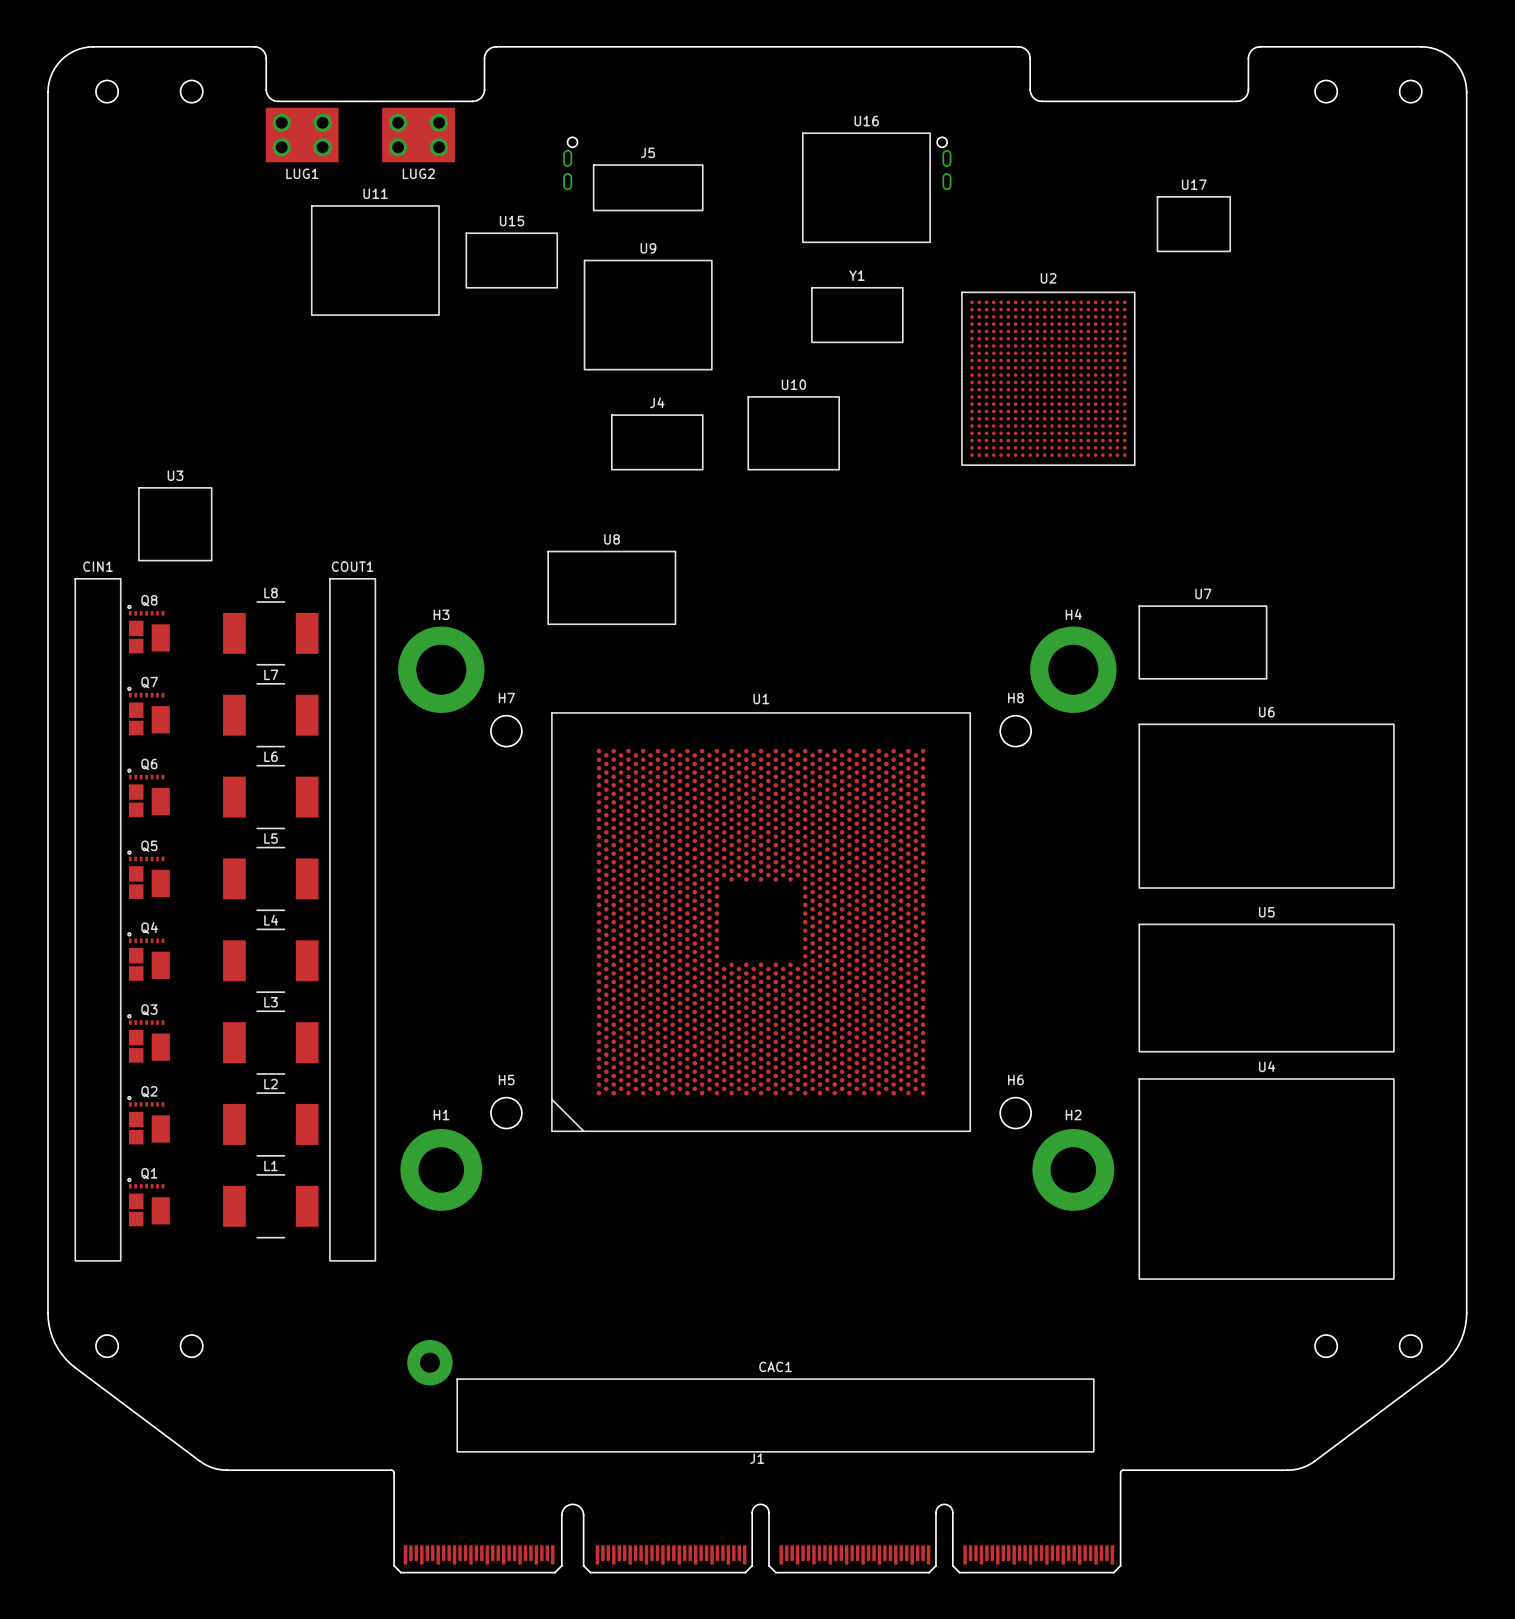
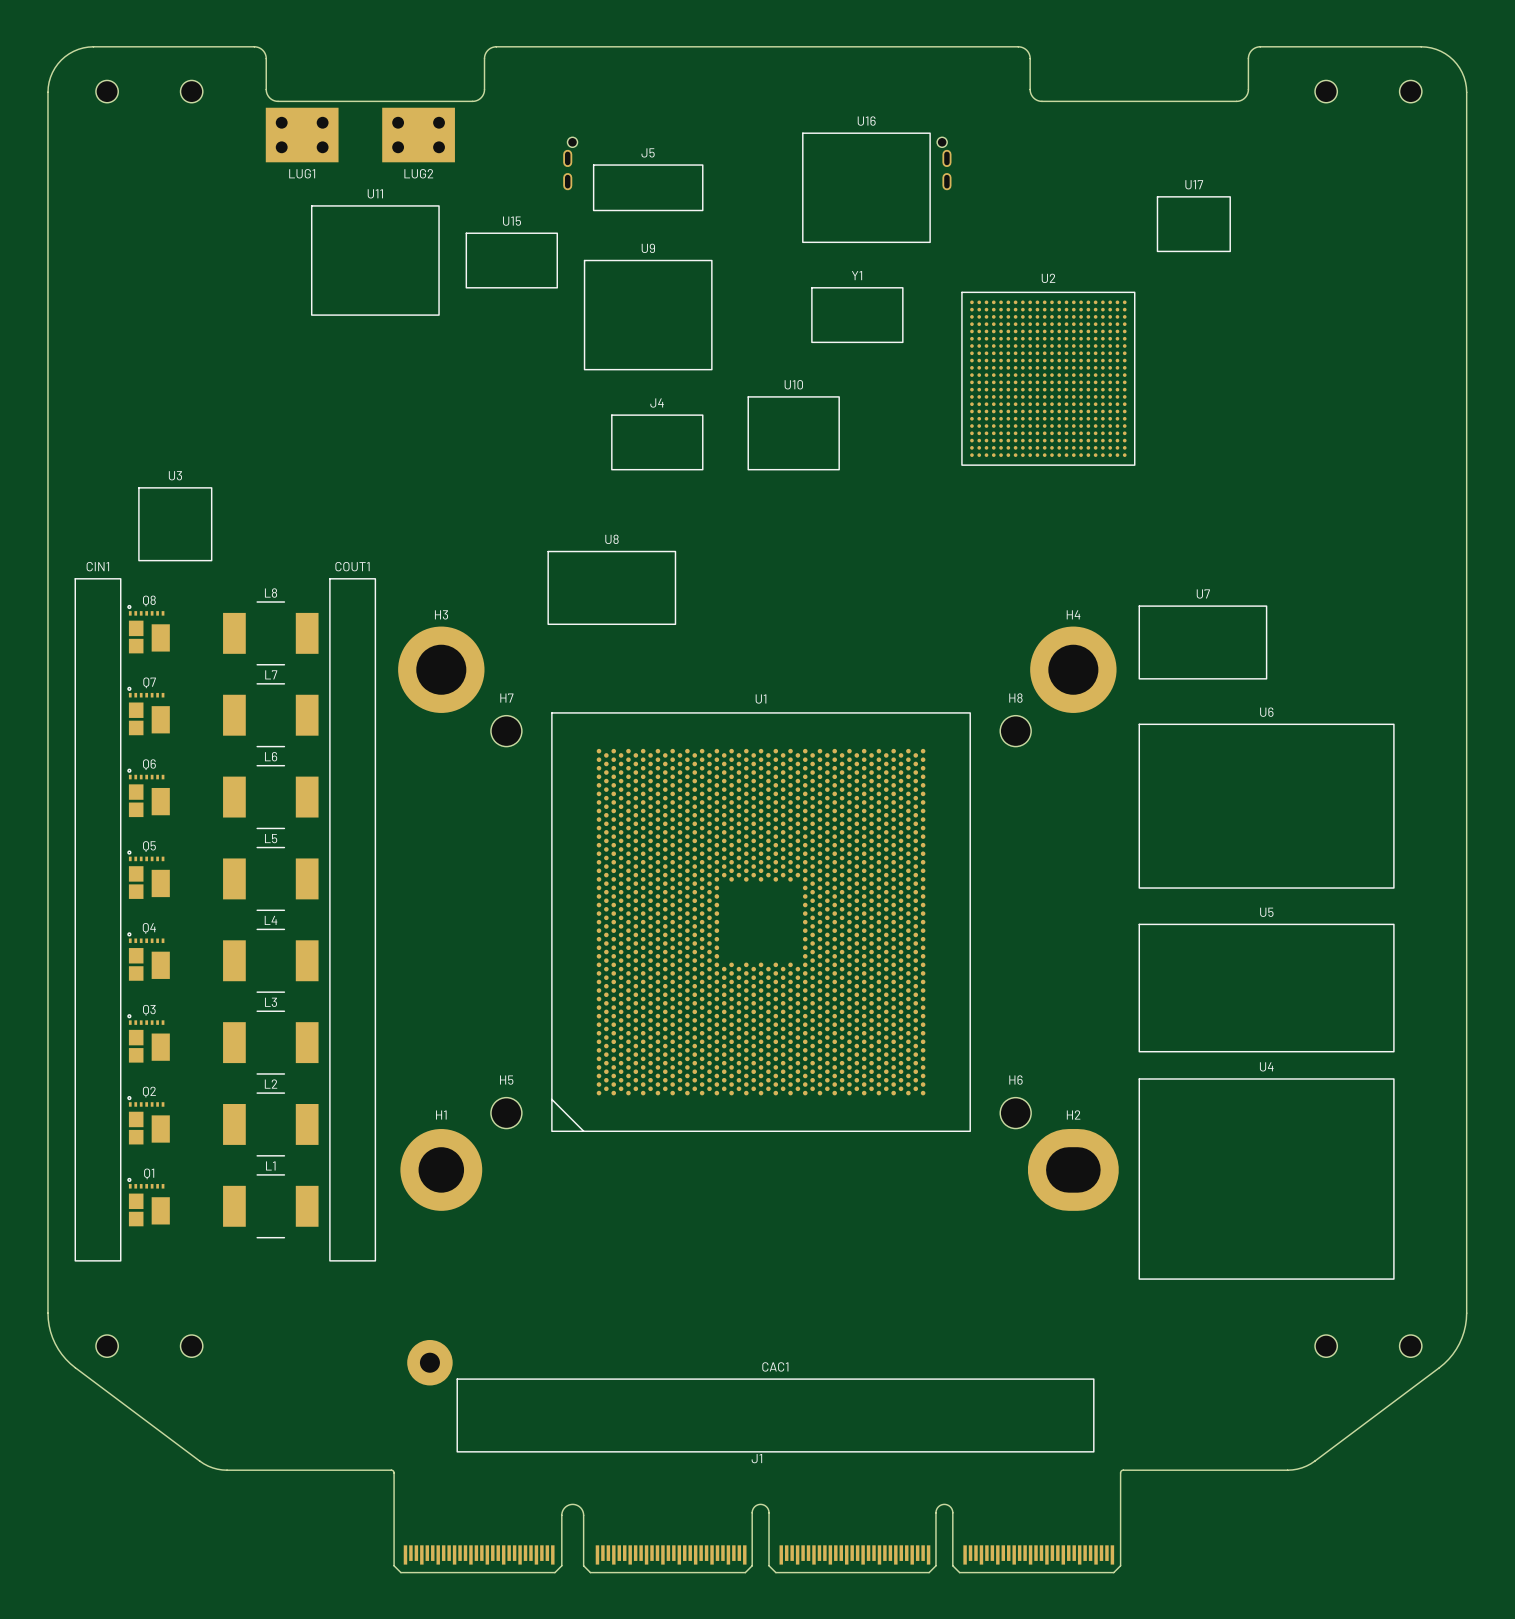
H2 footprint: [1032, 1129, 1115, 1211] -> [1027, 1129, 1119, 1211]

